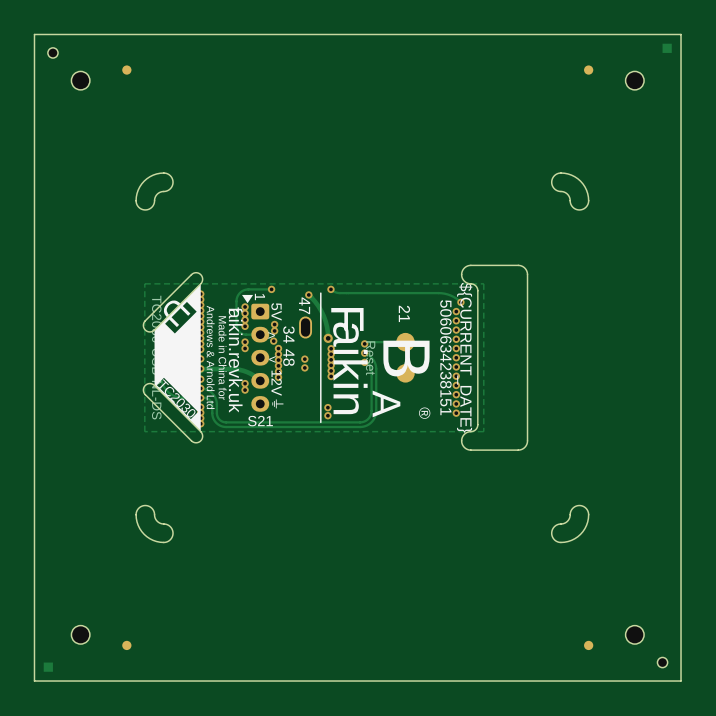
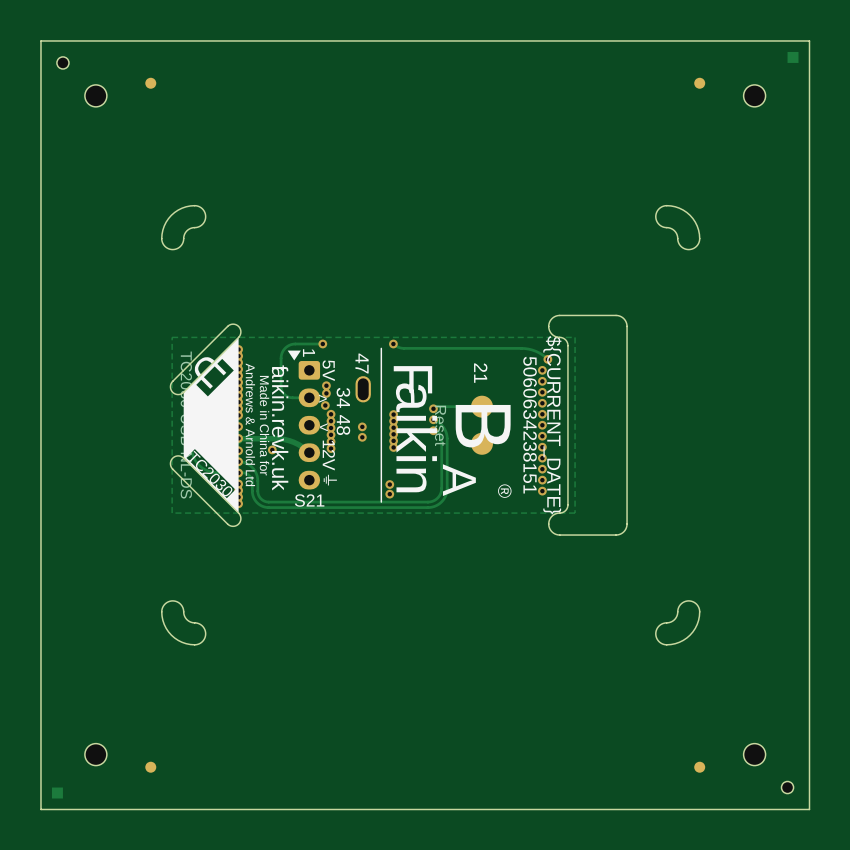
track: (308, 294) (323, 316) (328, 338) -> none
via: (308, 294) -> none
via: (245, 306) -> none
via: (245, 313) -> none
via: (245, 319) -> none
via: (245, 326) -> none
via: (328, 338) -> none
via: (245, 342) -> none
via: (245, 348) -> none
via: none -> (272, 449)
via: (245, 383) -> none
via: (245, 390) -> none

